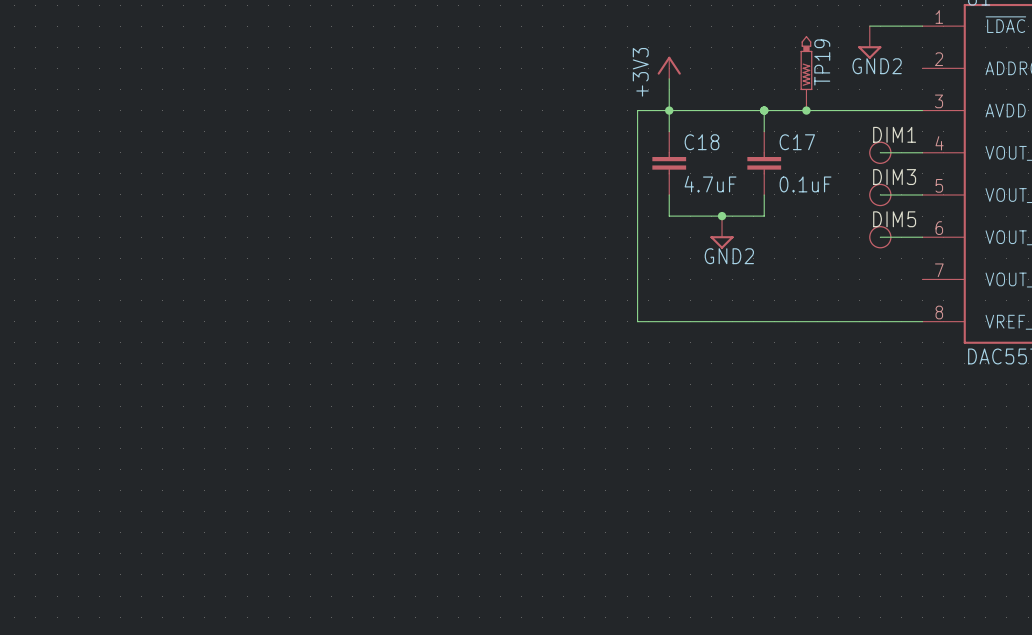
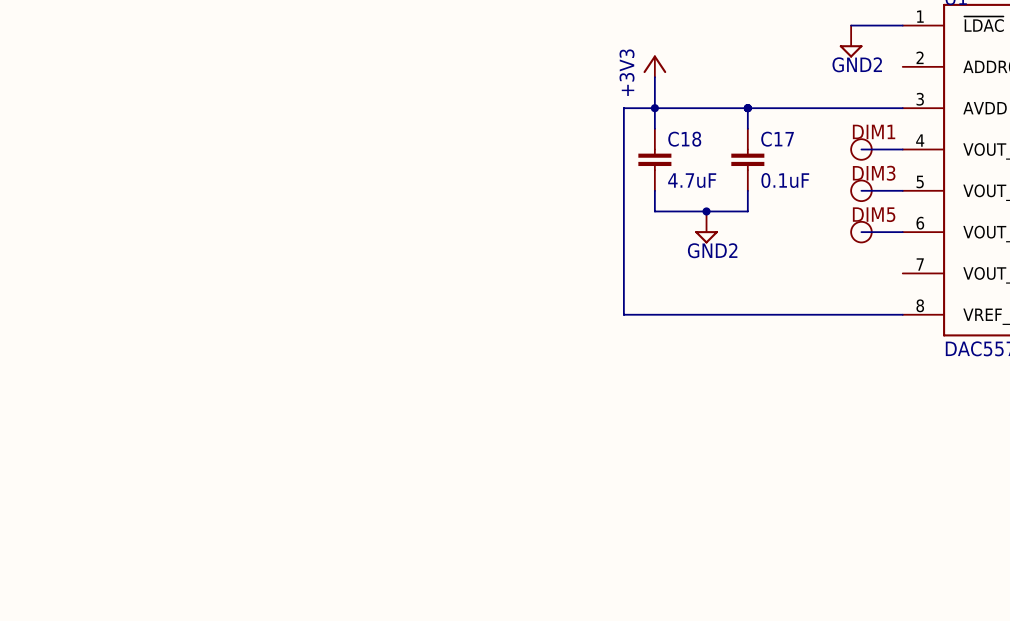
TP19: (806, 73) -> none
junction: (806, 110) -> none

